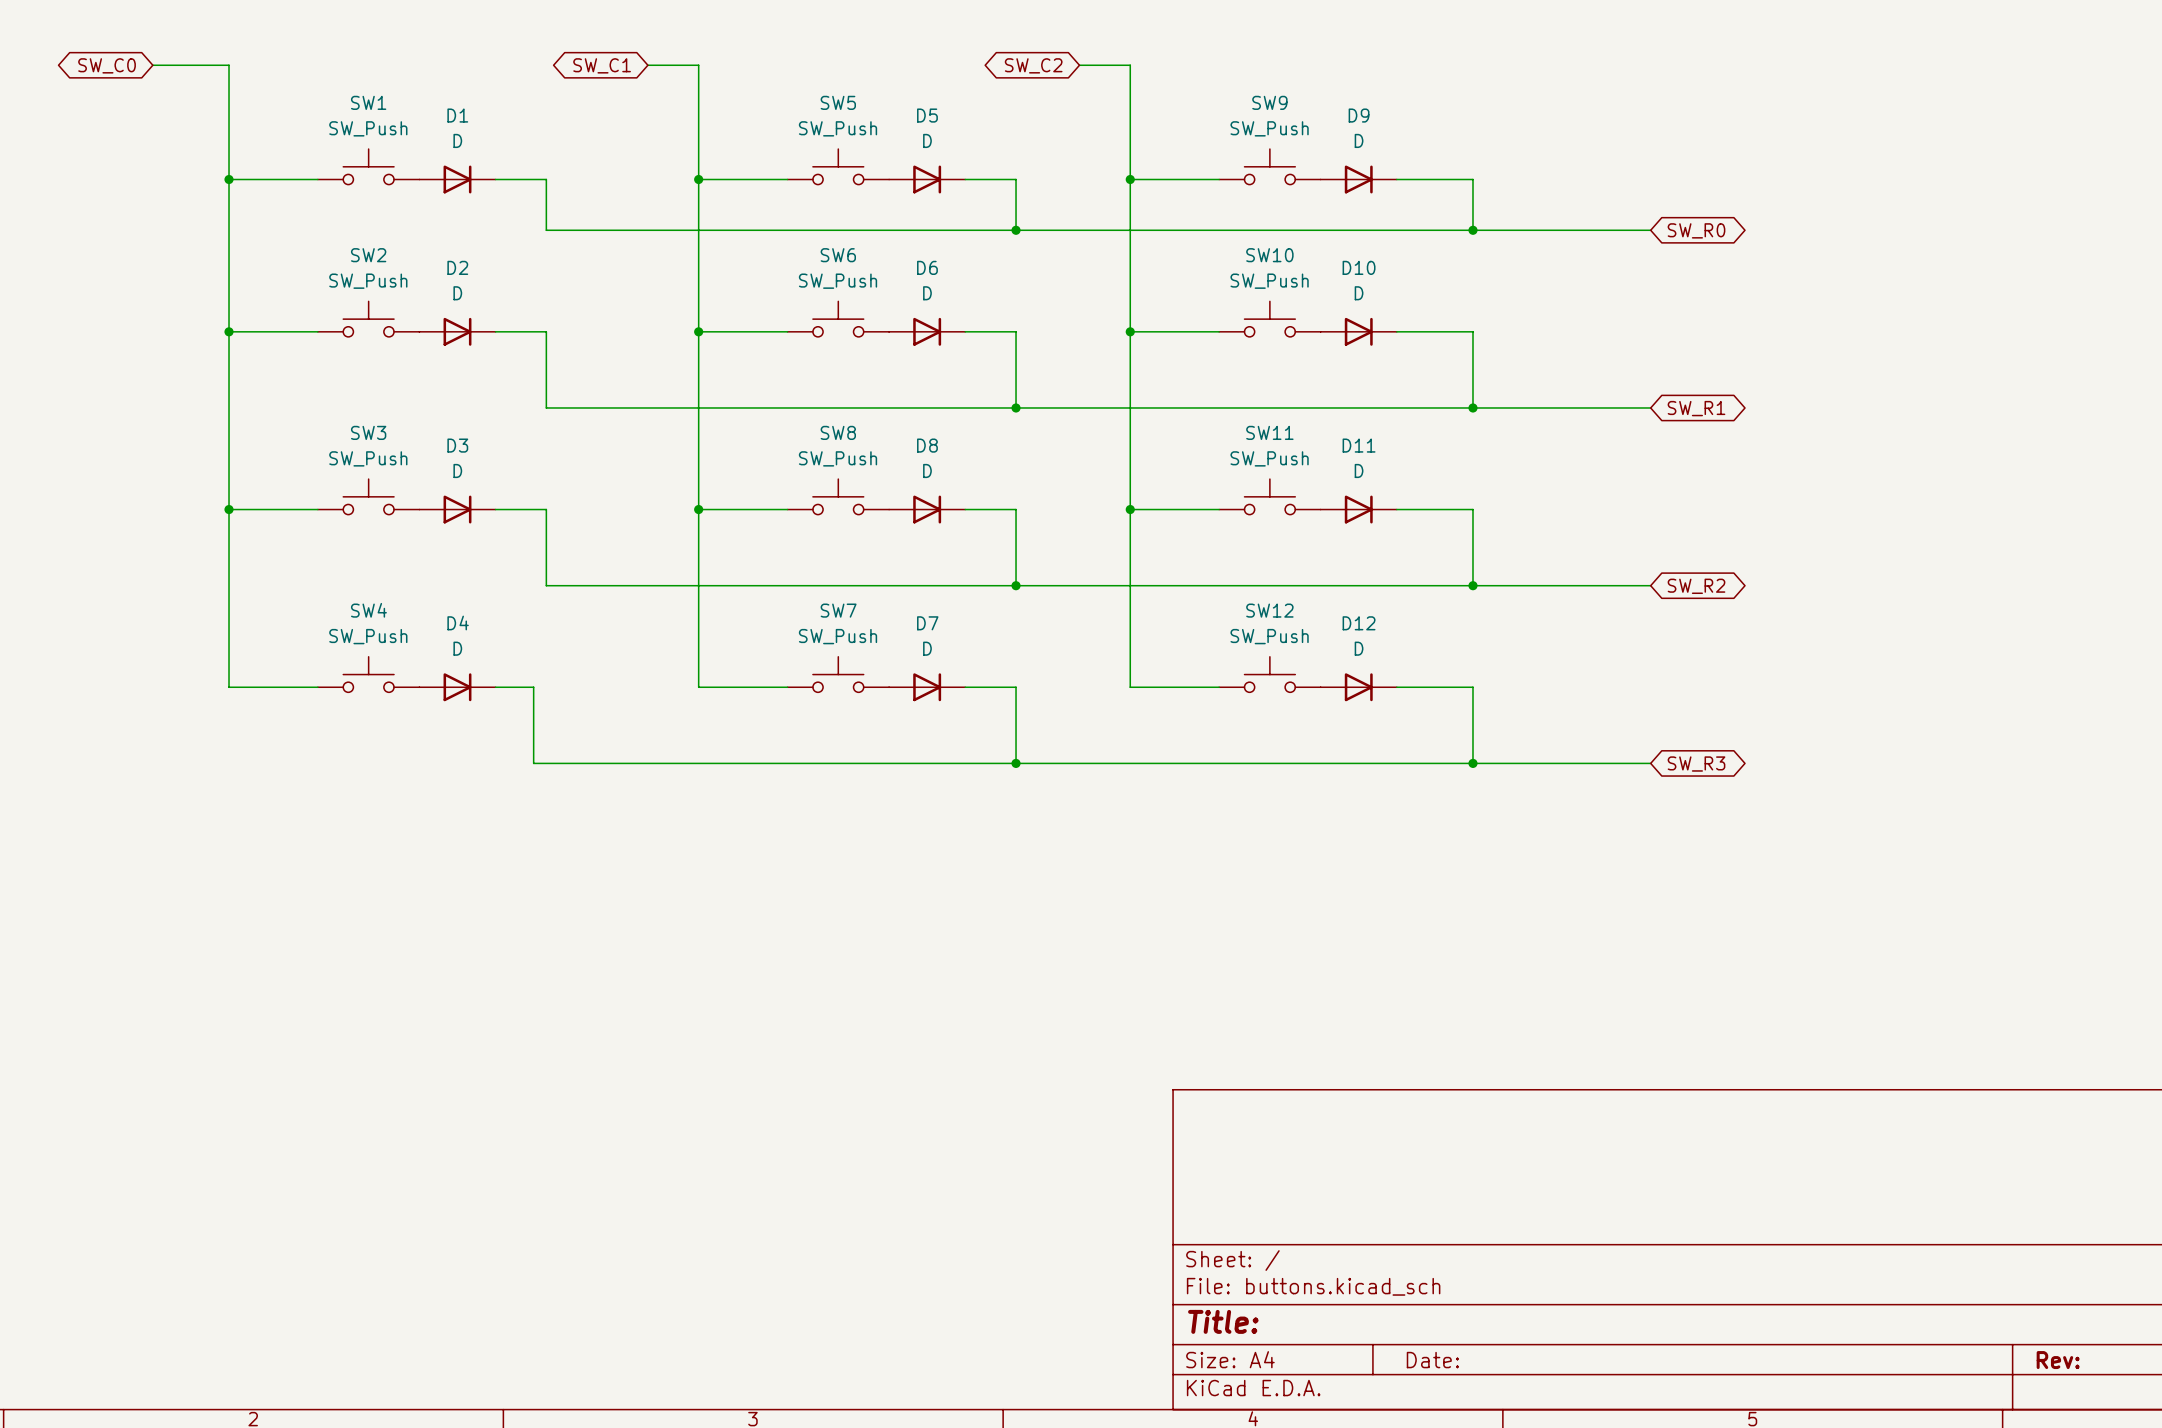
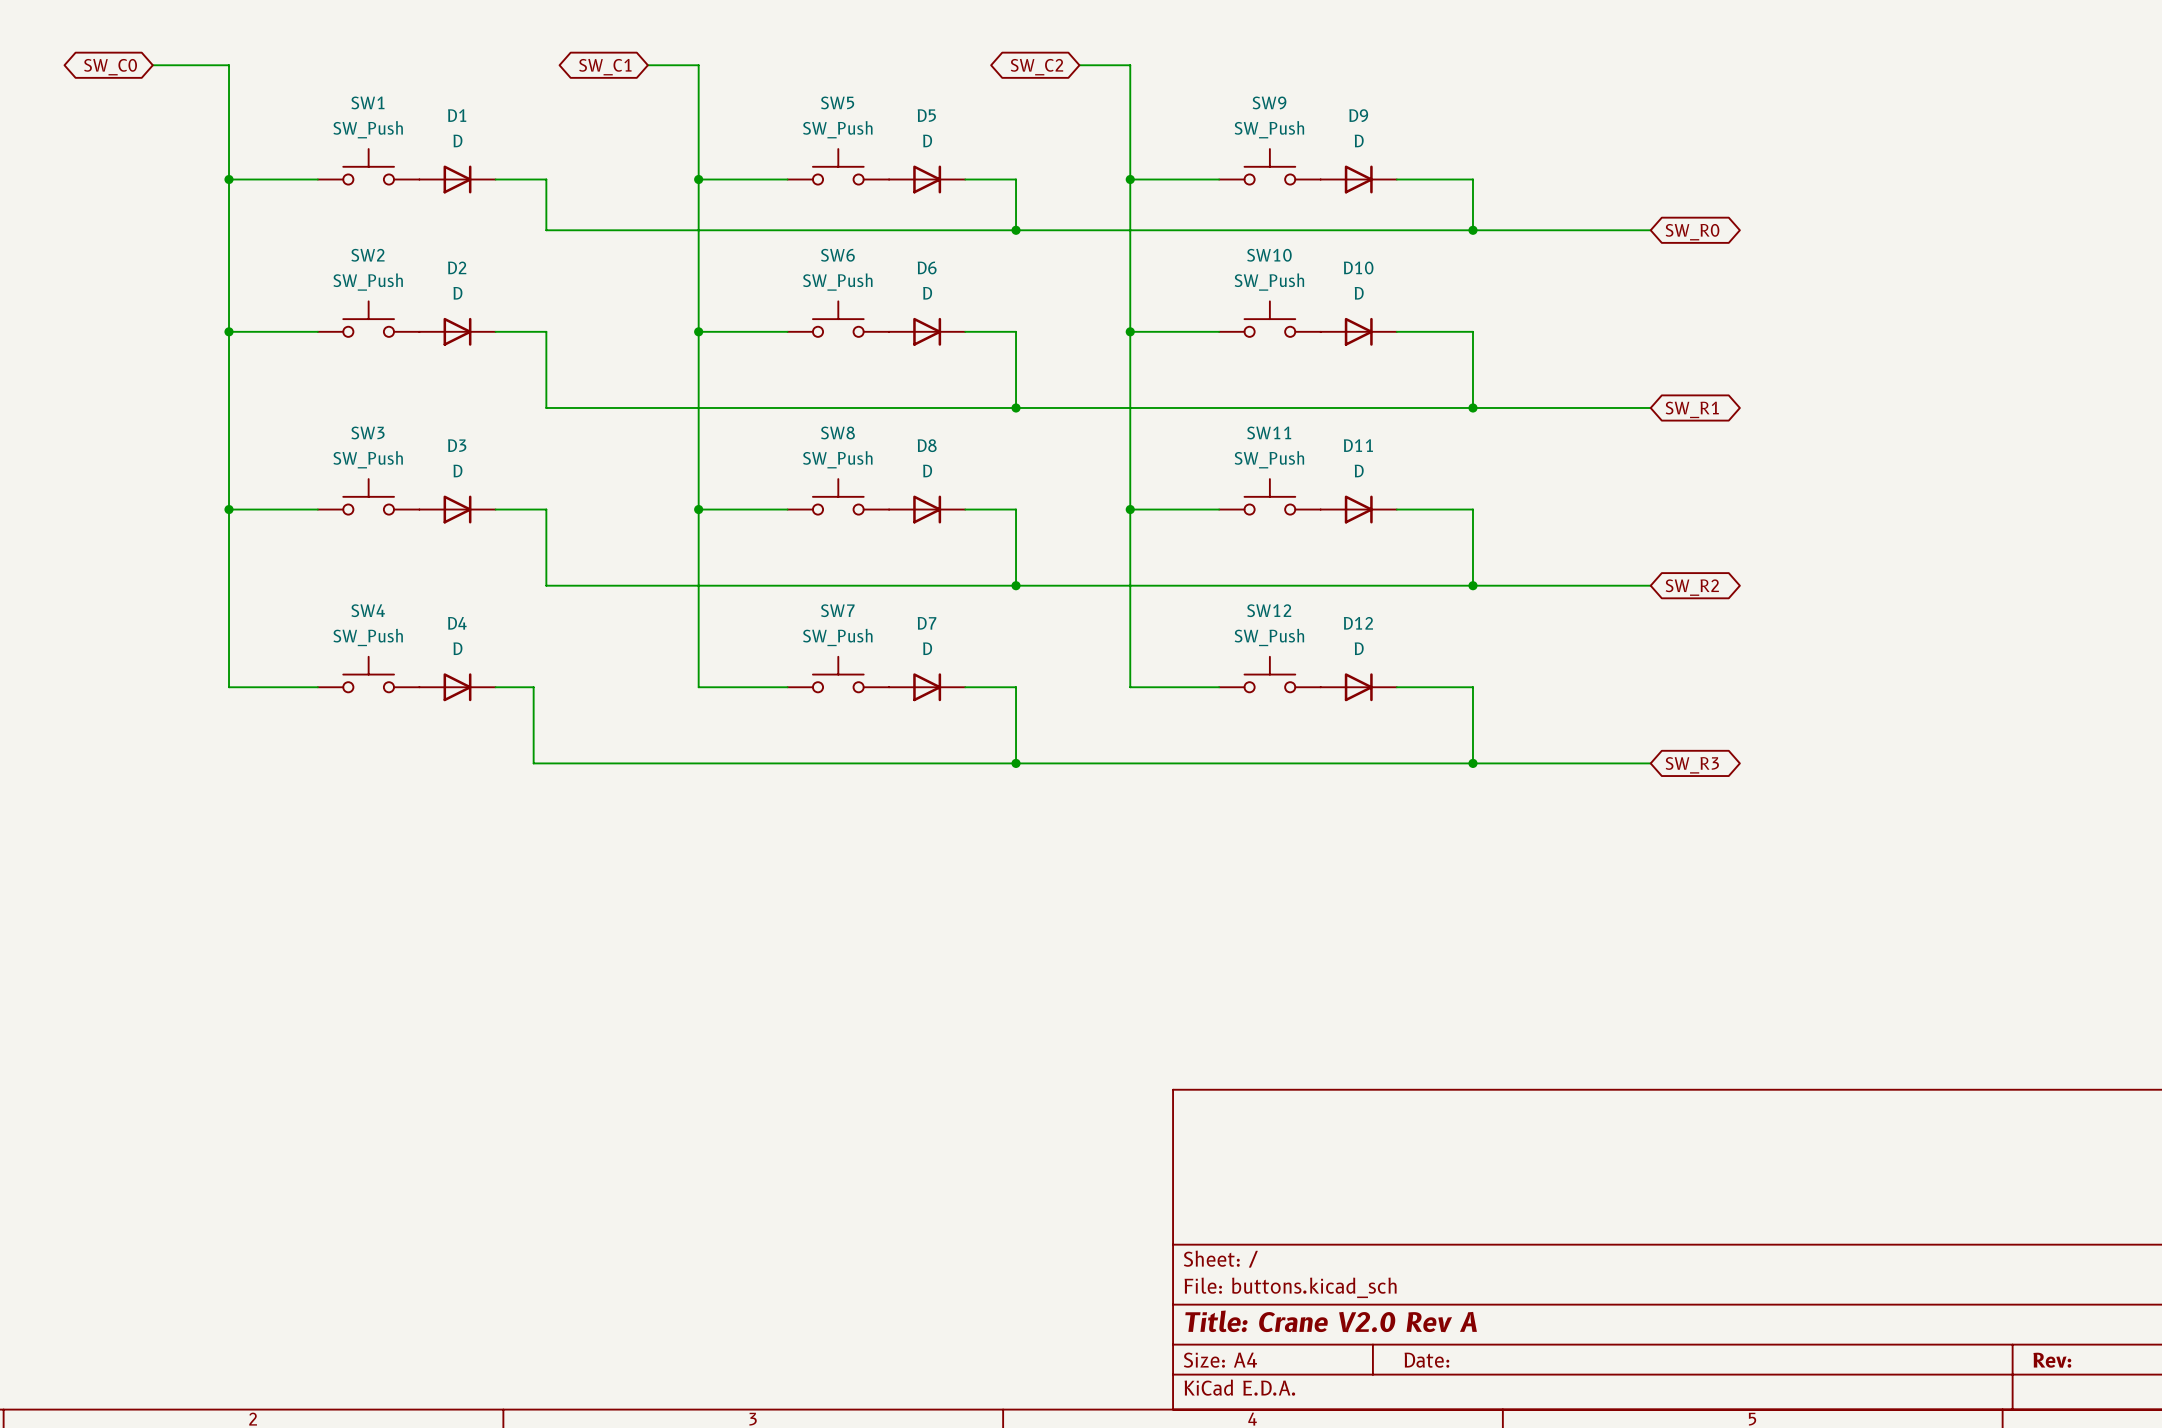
title block: Title: (1223, 1321) -> Title: Crane V2.0 Rev A (1331, 1321)

